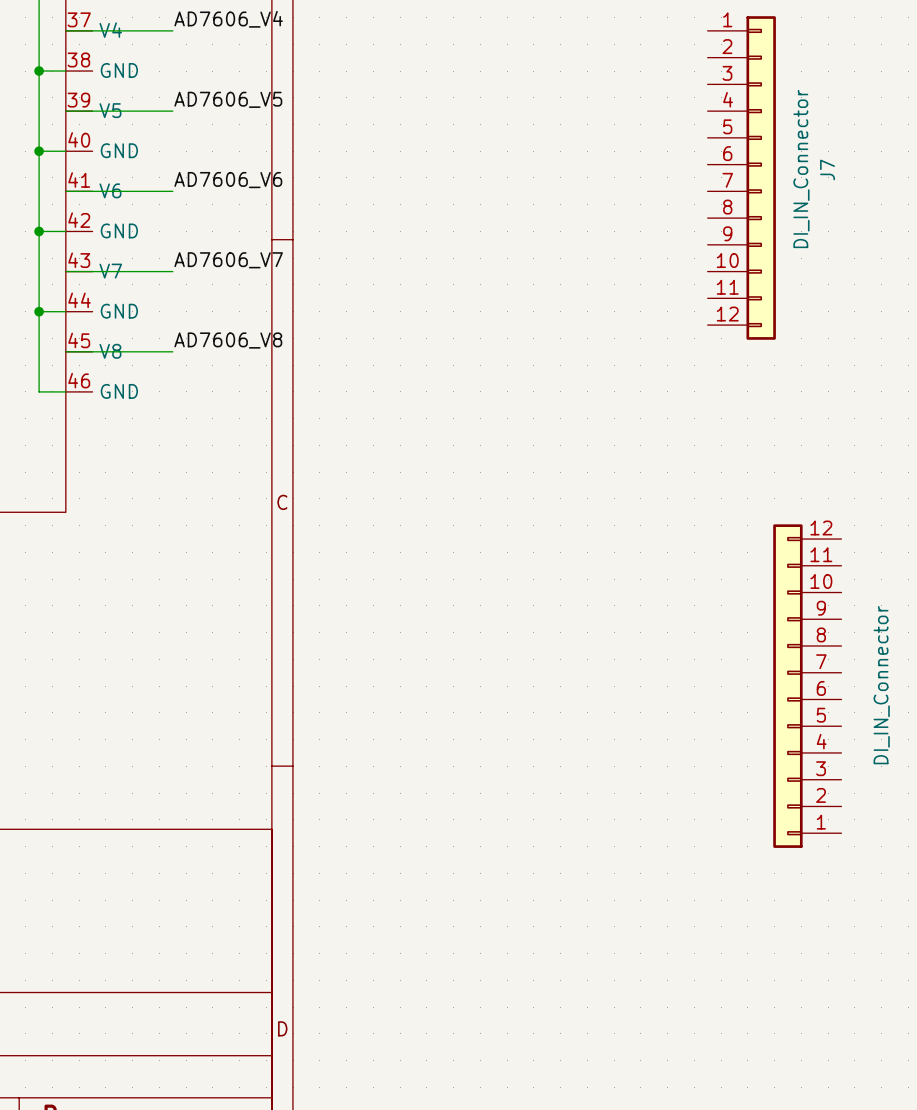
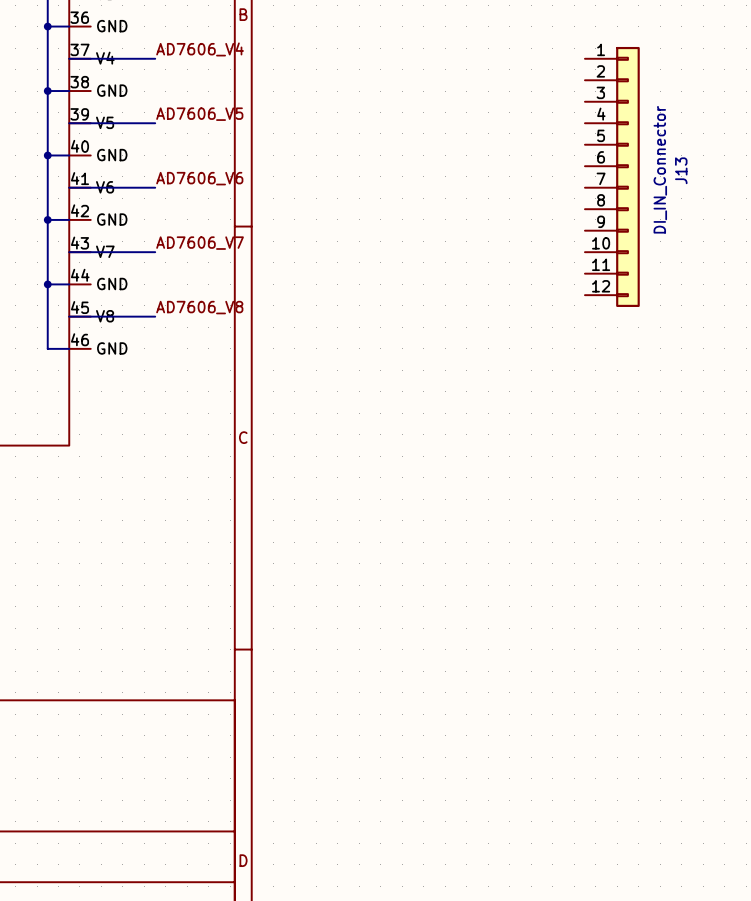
J7 name: J7 (827, 169) -> J13 (681, 170)
part: DI_IN_Connector (807, 686) -> none

